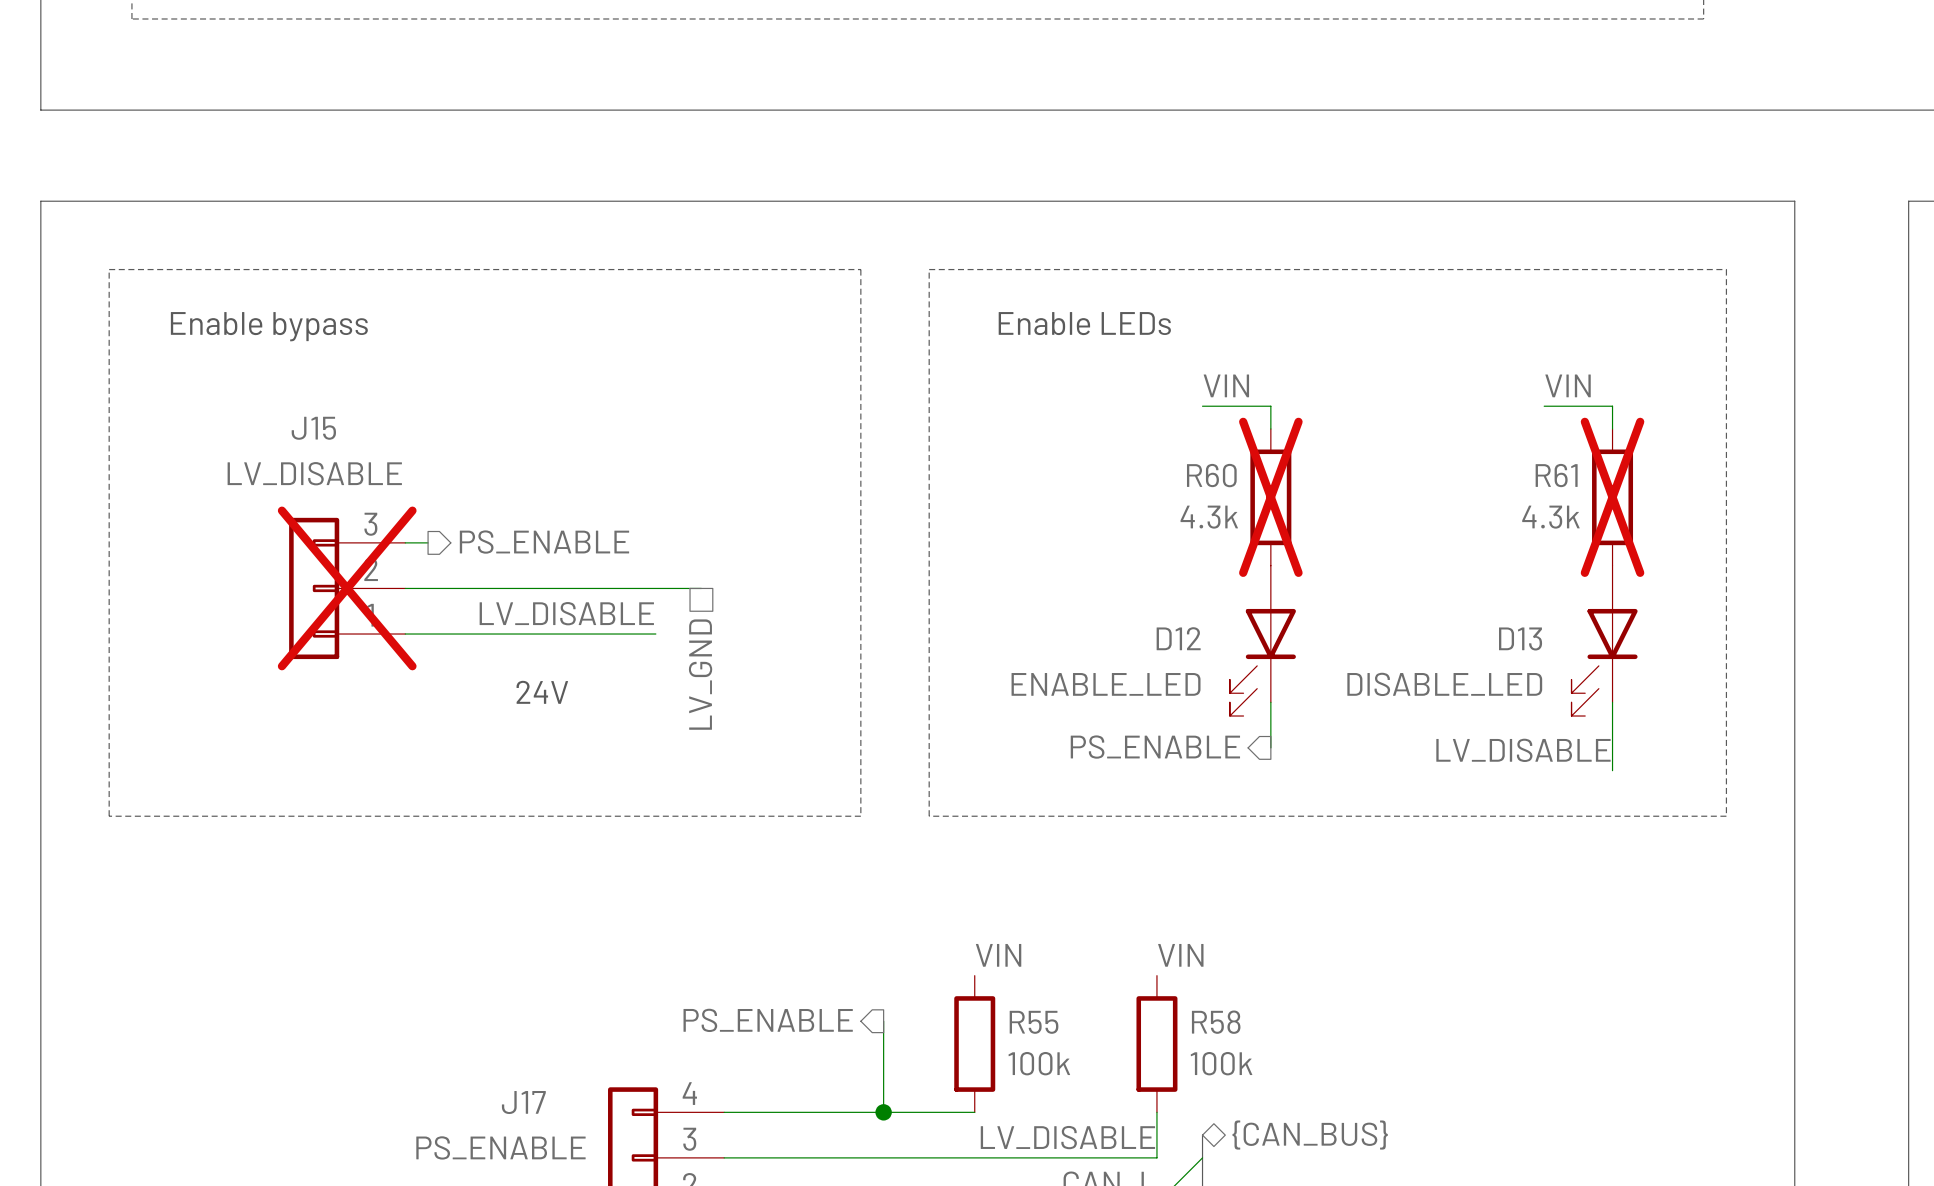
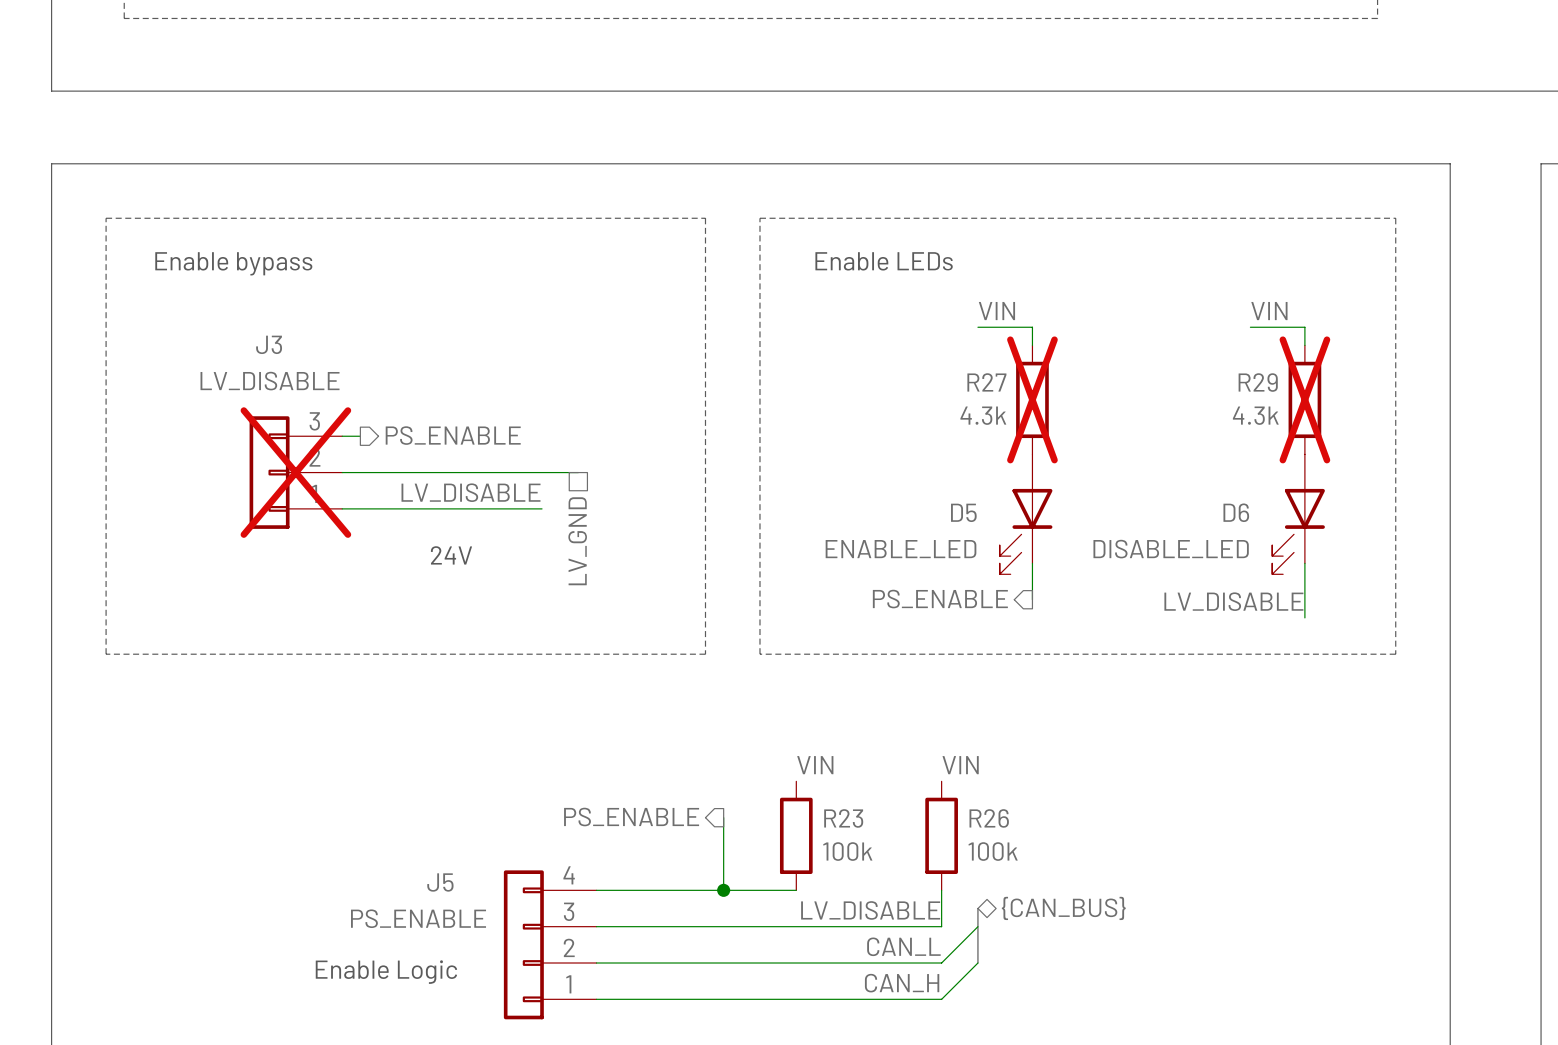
J15 name: J15 (313, 428) -> J3 (269, 344)
R60 name: R60 (1211, 475) -> R27 (986, 382)
R61 name: R61 (1556, 475) -> R29 (1258, 382)
D12 name: D12 (1178, 638) -> D5 (963, 512)
D13 name: D13 (1520, 638) -> D6 (1236, 512)
R55 name: R55 (1034, 1022) -> R23 (843, 818)
R58 name: R58 (1216, 1022) -> R26 (989, 818)
J17 name: J17 (523, 1102) -> J5 (440, 882)

